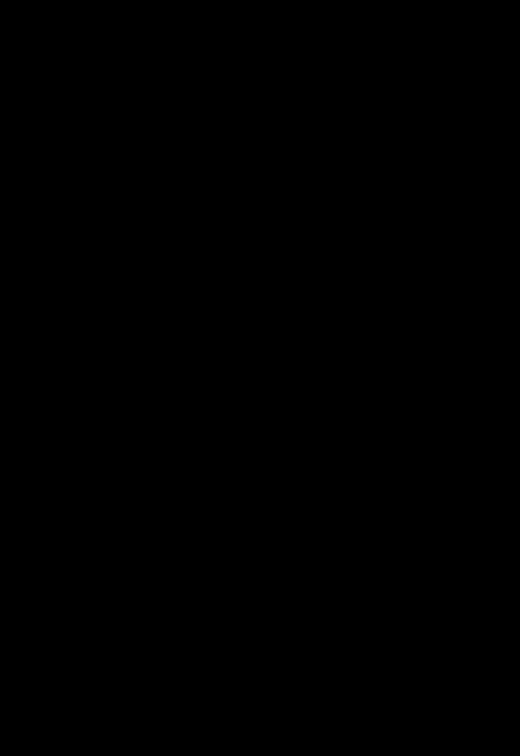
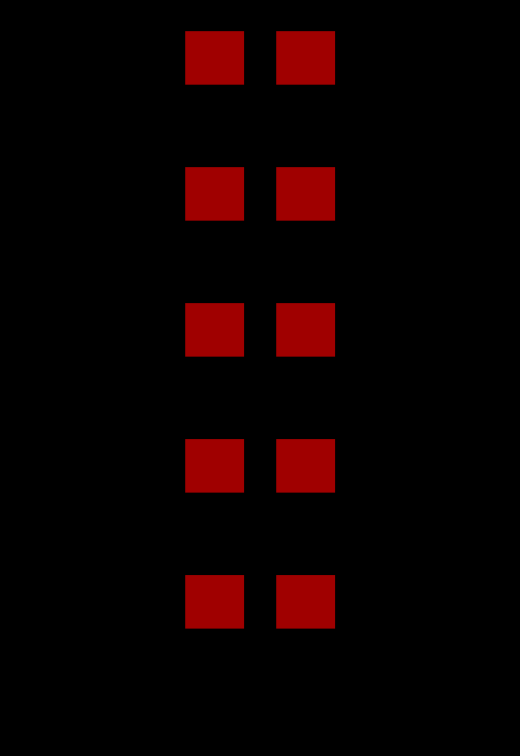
part: none -> (260, 57)
part: none -> (260, 193)
part: none -> (260, 329)
part: none -> (260, 465)
part: none -> (260, 601)

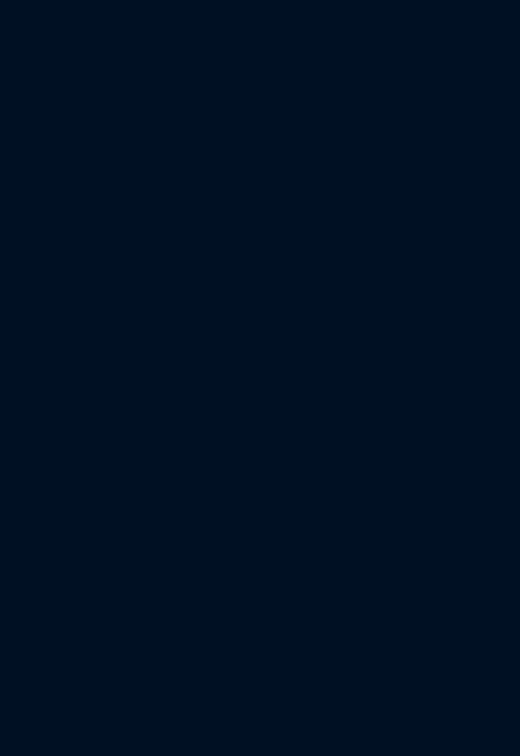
part: (260, 57) -> none
part: (260, 193) -> none
part: (260, 329) -> none
part: (260, 465) -> none
part: (260, 601) -> none

